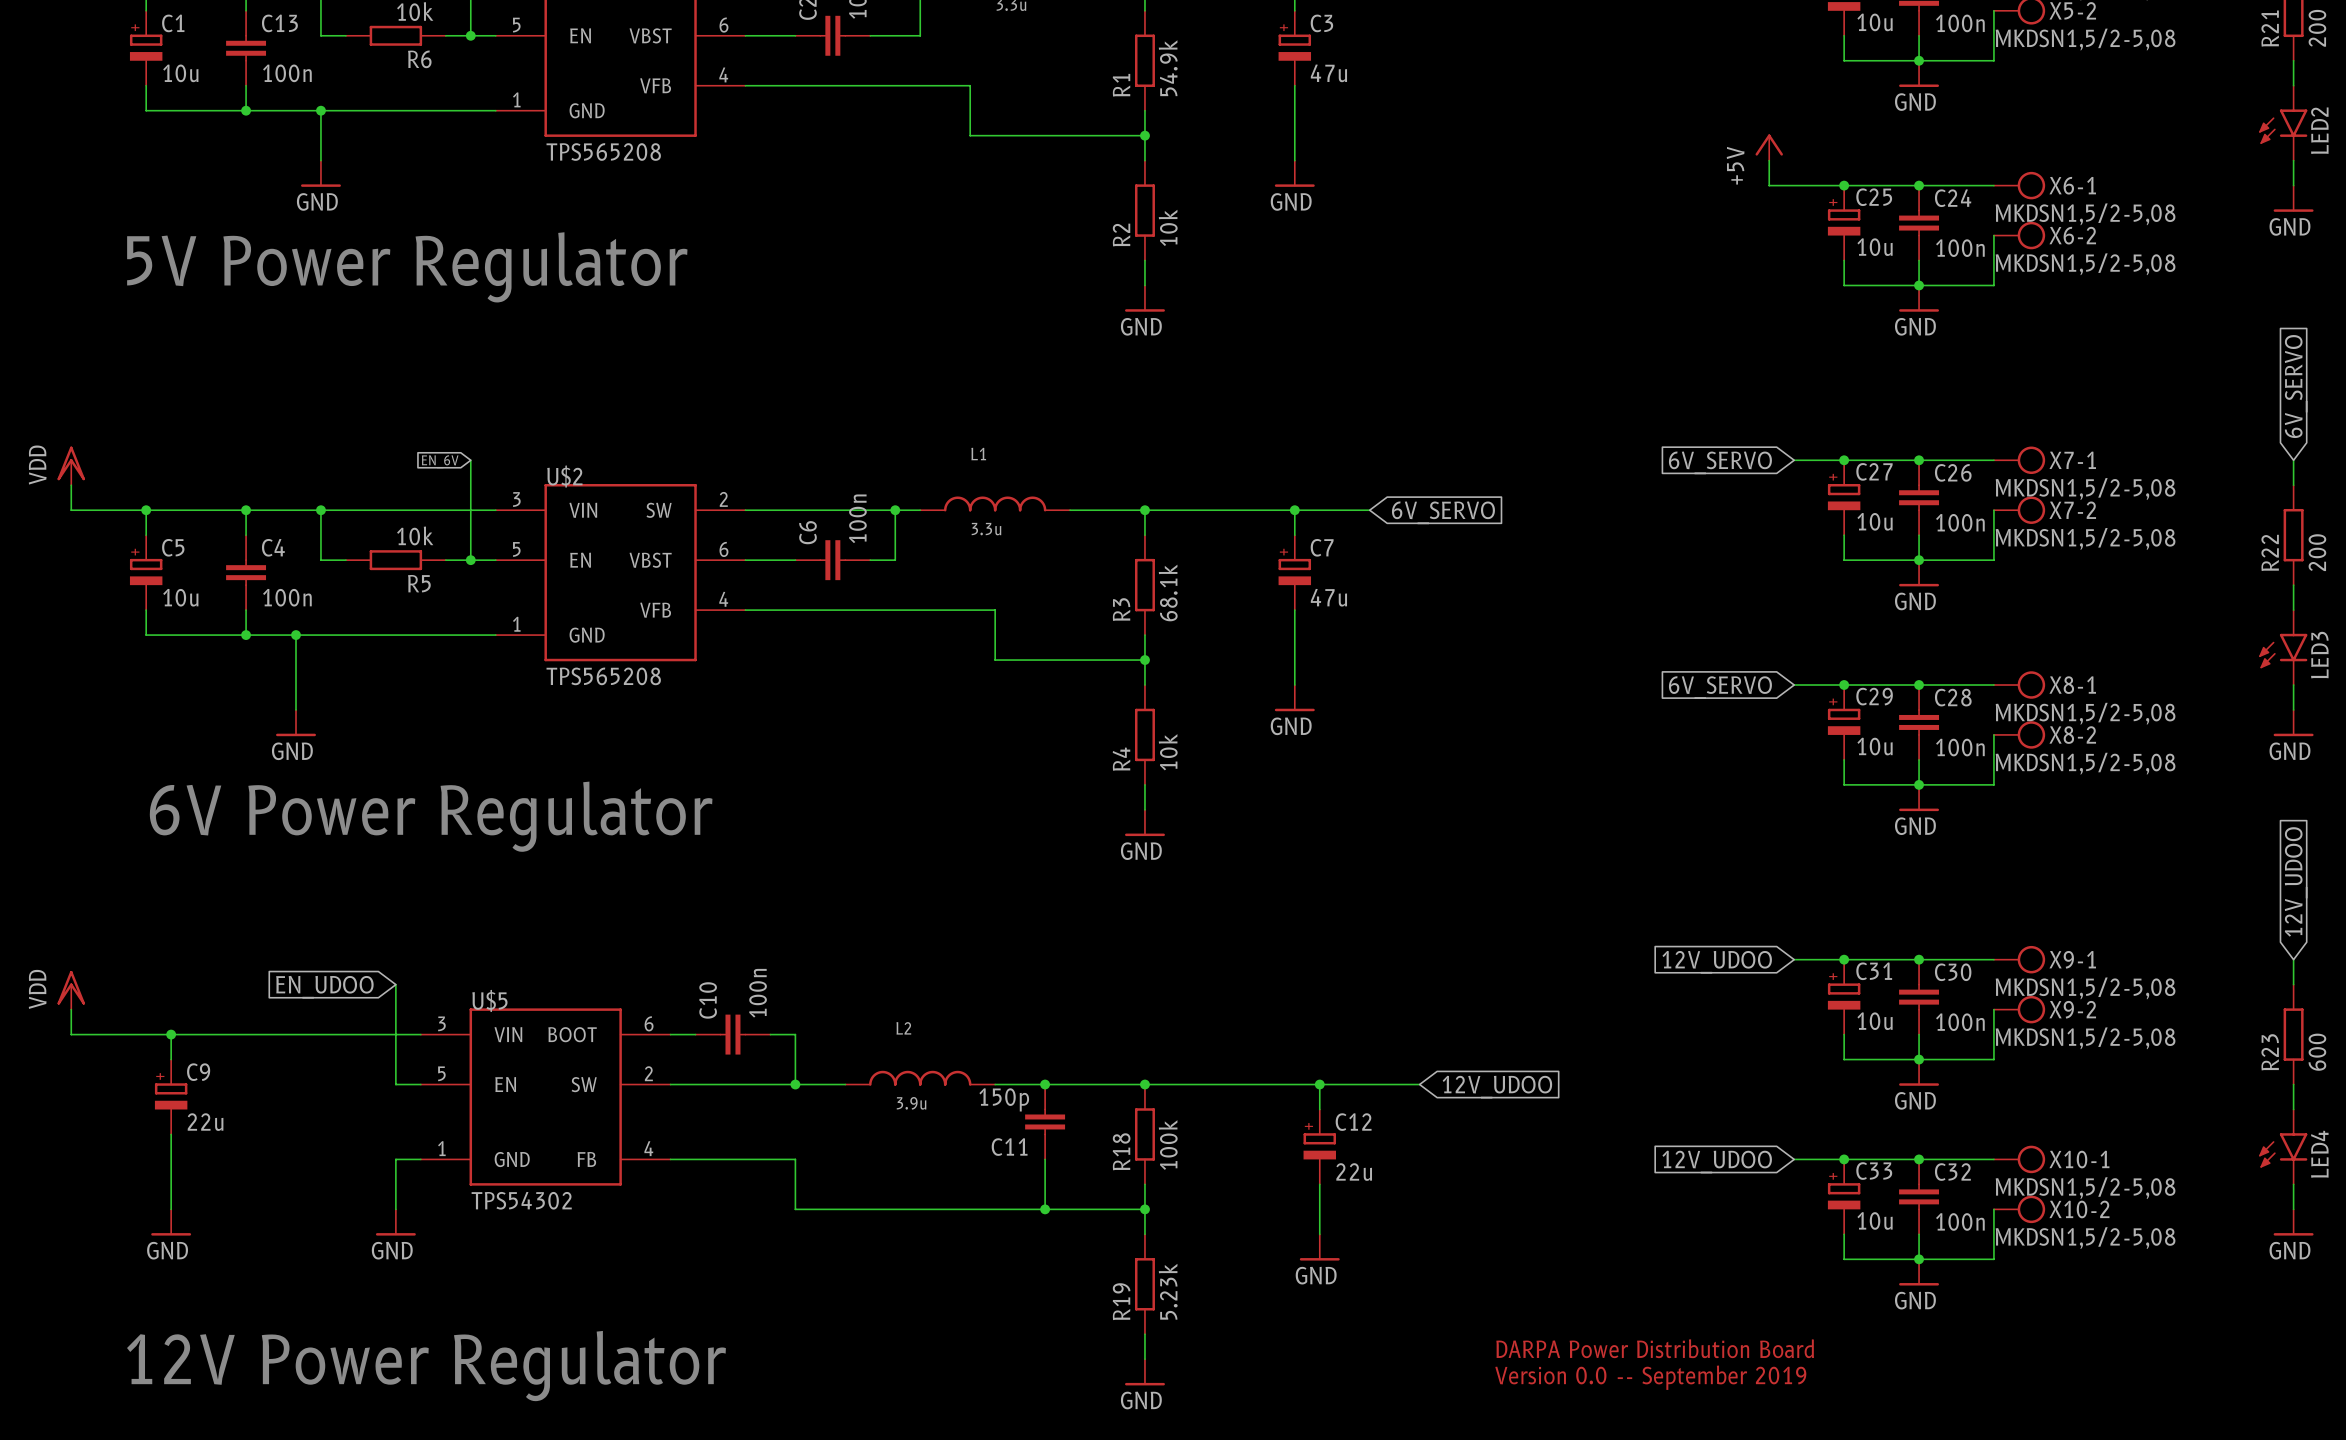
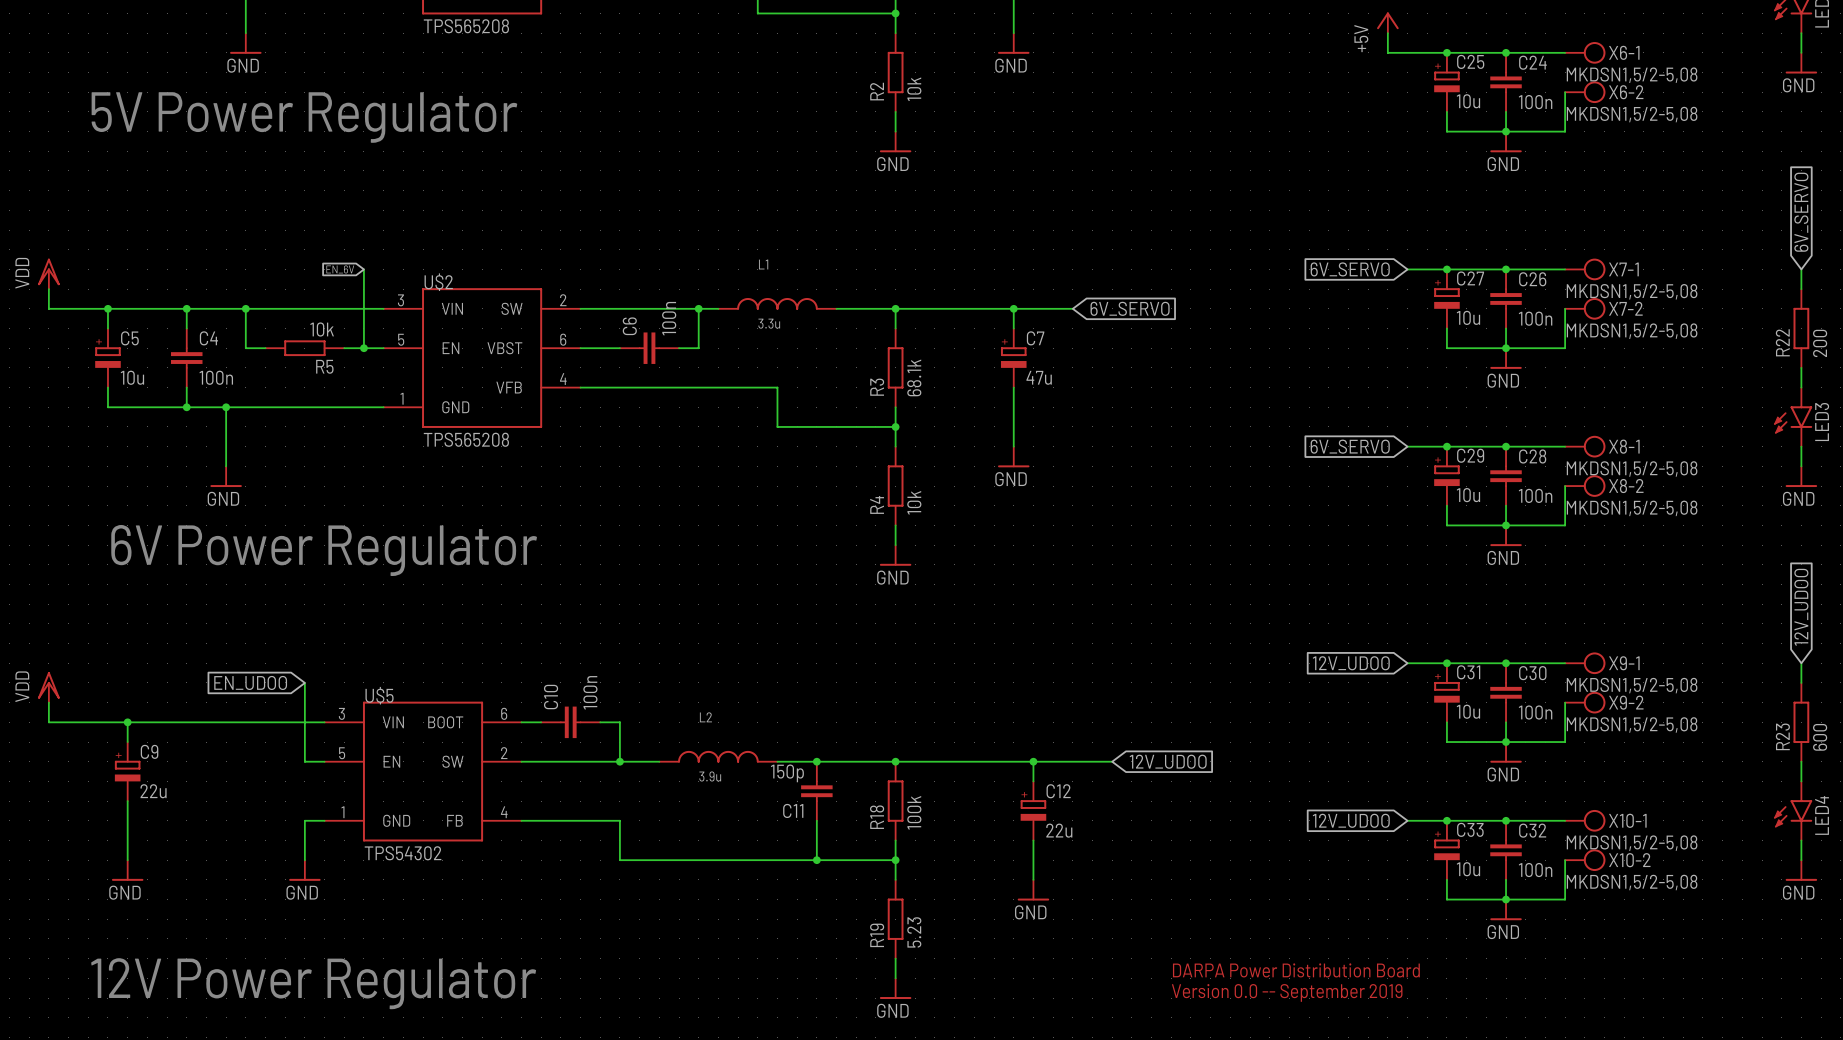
R19 value: 5.23k (1168, 1291) -> 5.23 (914, 932)

